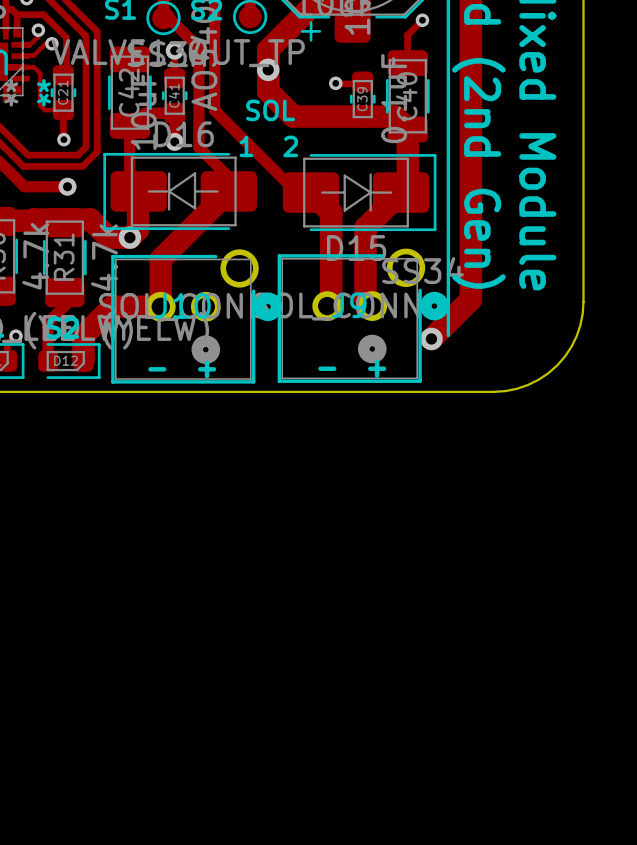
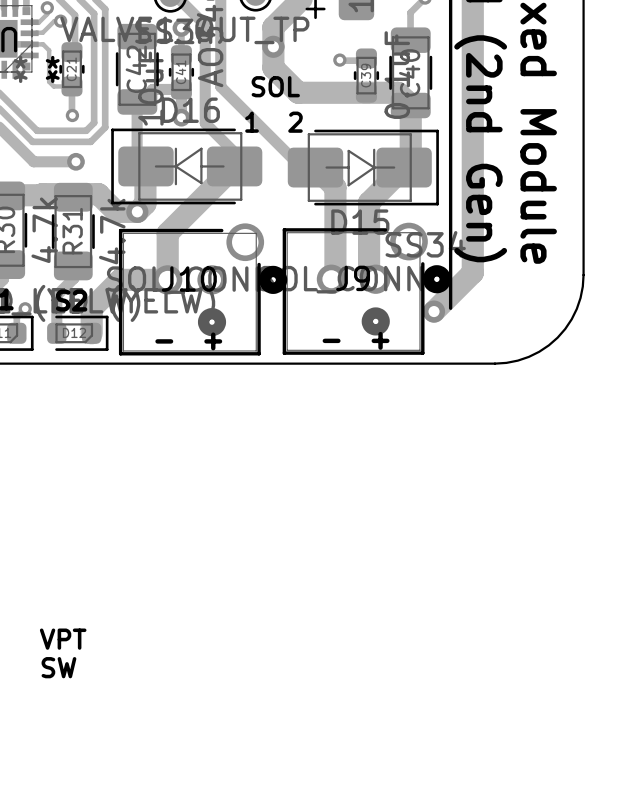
text: none -> VPT (63, 639)
text: none -> SW (58, 667)

